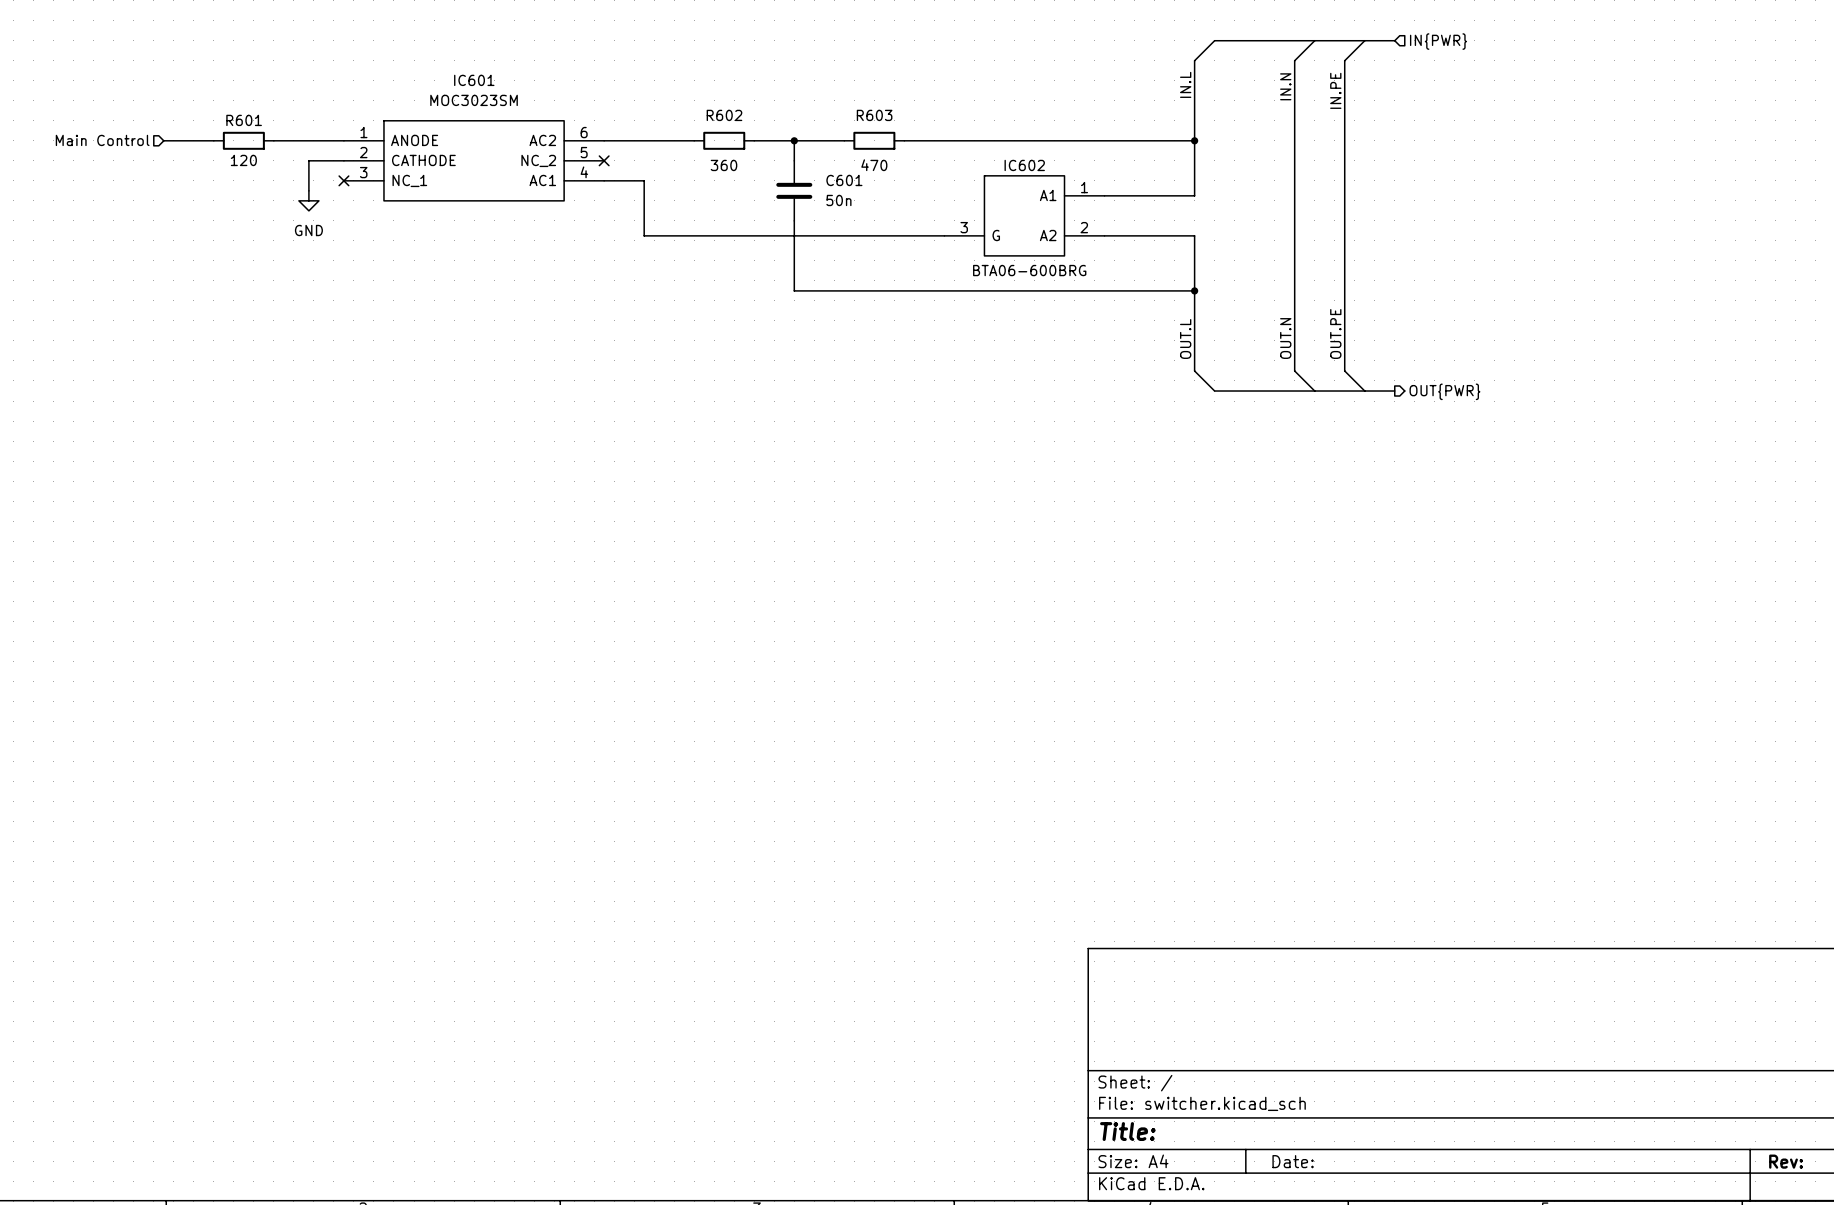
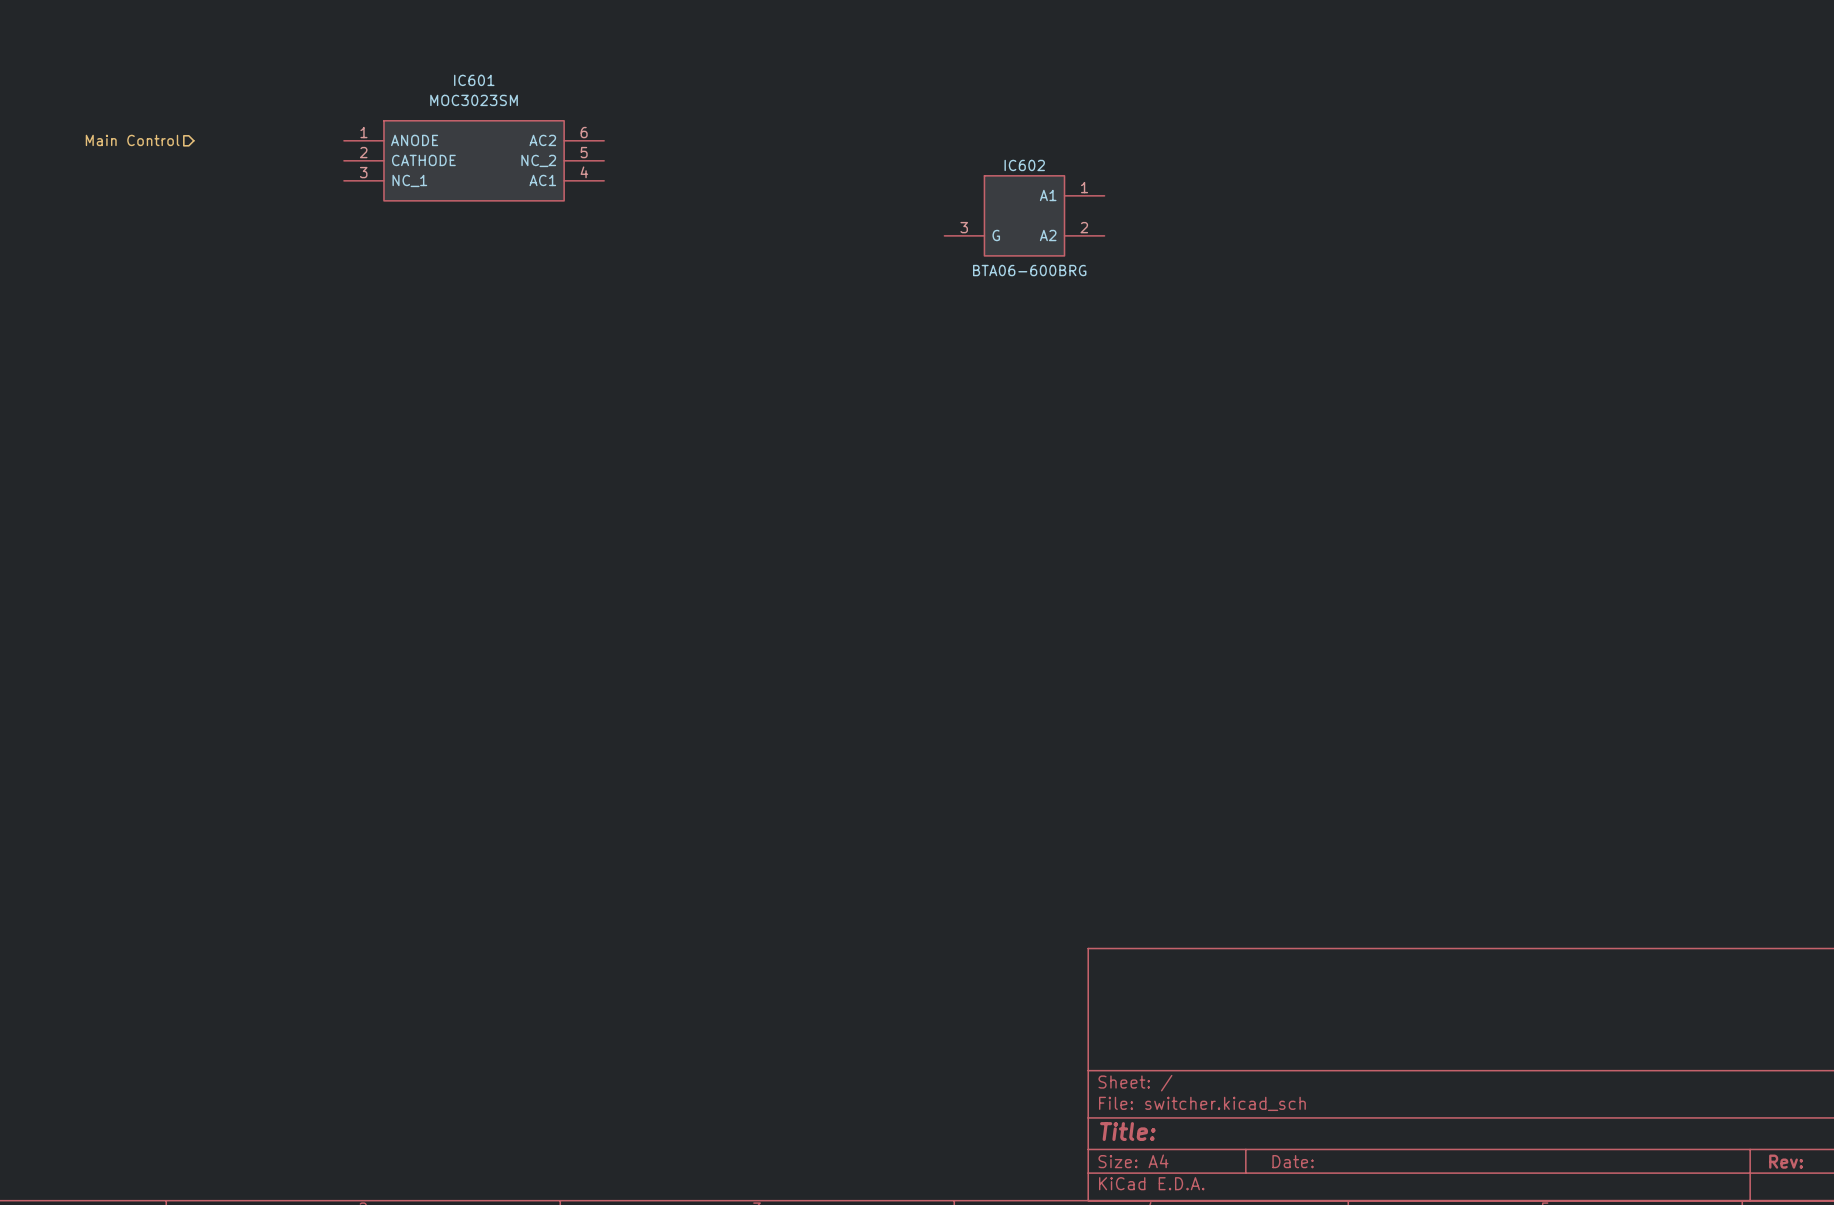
wire: (1214, 40) (1194, 60) (1194, 195) (1104, 195) -> none
bus: (1214, 40) (1394, 40) -> none
wire: (1314, 40) (1294, 60) (1294, 370) (1314, 391) -> none
wire: (1364, 40) (1344, 60) (1344, 370) (1364, 391) -> none
hierarchical label: IN{PWR} (1438, 41) -> none
label: IN.L (1185, 84) -> none
label: IN.N (1285, 86) -> none
label: IN.PE (1335, 90) -> none
hierarchical label position: Main Control (102, 140) -> Main Control (132, 140)
wire: (163, 140) (213, 140) -> none
R601: 120 (243, 140) -> none
wire: (273, 140) (343, 140) -> none
wire: (604, 140) (694, 140) -> none
R602: 360 (724, 140) -> none
wire: (754, 140) (844, 140) -> none
wire: (794, 140) (794, 160) -> none
junction: (794, 140) -> none
R603: 470 (874, 140) -> none
wire: (904, 140) (1194, 140) -> none
junction: (1194, 140) -> none
wire: (343, 160) (308, 160) (308, 190) -> none
no-connect mark: (604, 160) -> none
no-connect mark: (343, 180) -> none
wire: (604, 180) (644, 180) (644, 235) (944, 235) -> none
C601: 50n (794, 190) -> none
power symbol: GND (308, 200) -> none
wire: (794, 220) (794, 290) (1194, 290) -> none
wire: (1104, 235) (1194, 235) (1194, 370) (1214, 391) -> none
junction: (1194, 290) -> none
label: OUT.PE (1335, 333) -> none
label: OUT.L (1185, 338) -> none
label: OUT.N (1285, 338) -> none
bus: (1214, 391) (1394, 391) -> none
hierarchical label: OUT{PWR} (1444, 391) -> none

